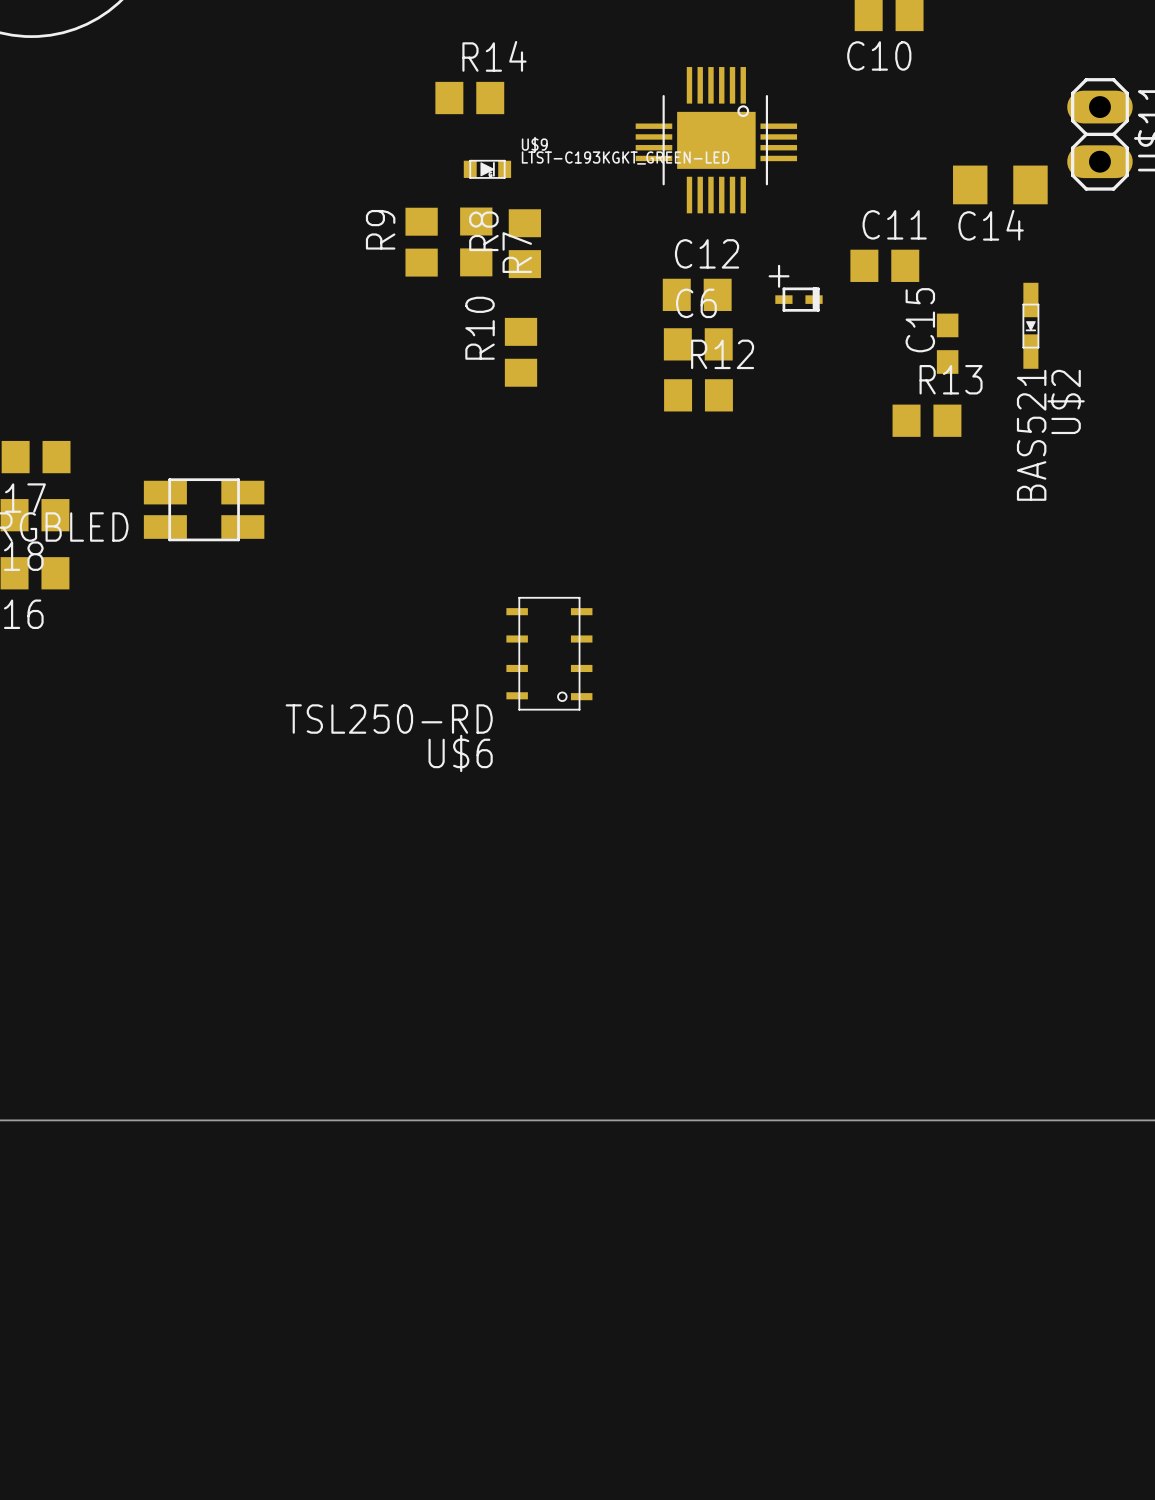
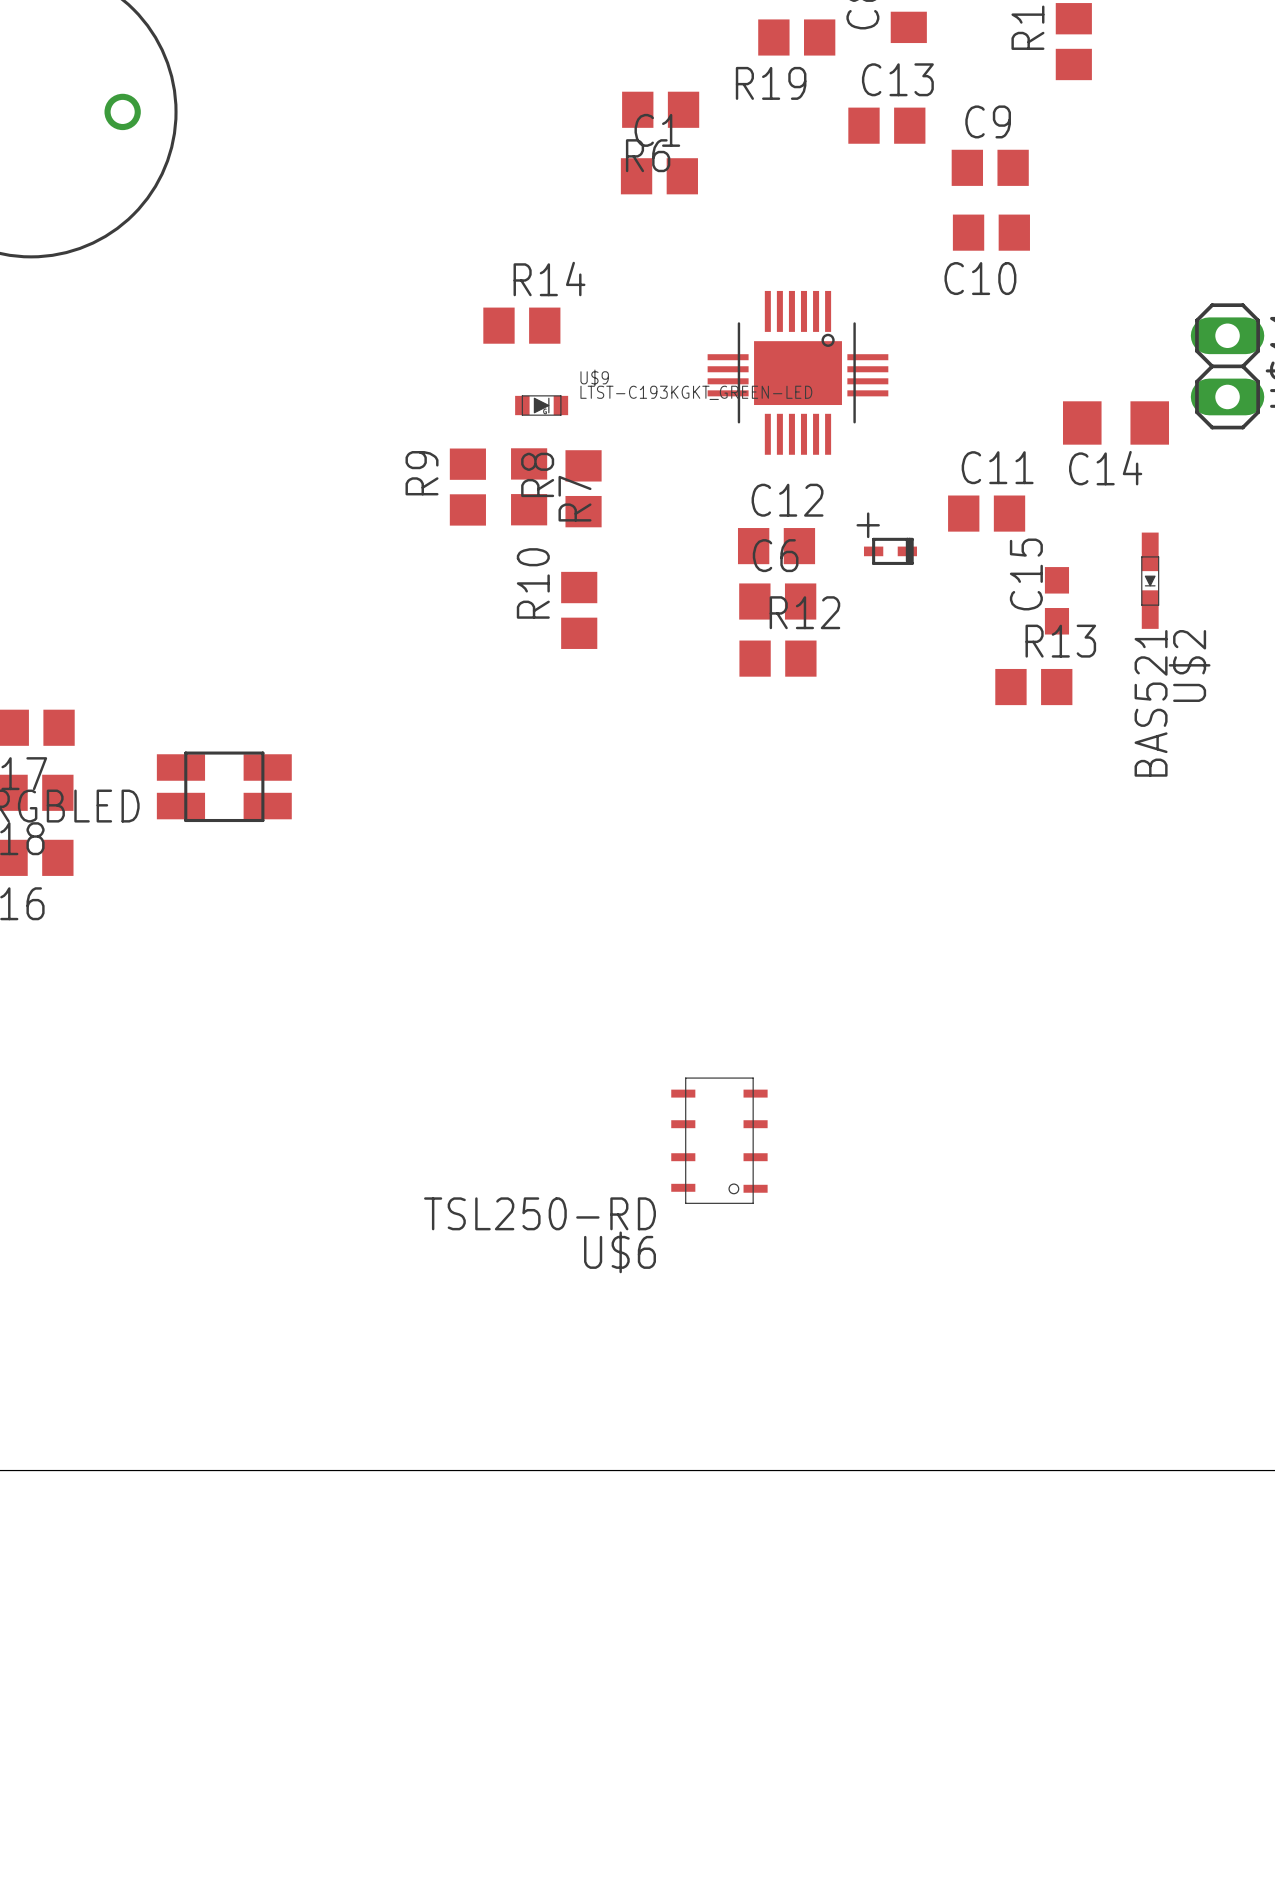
U$6 position: (549, 653) -> (719, 1140)

